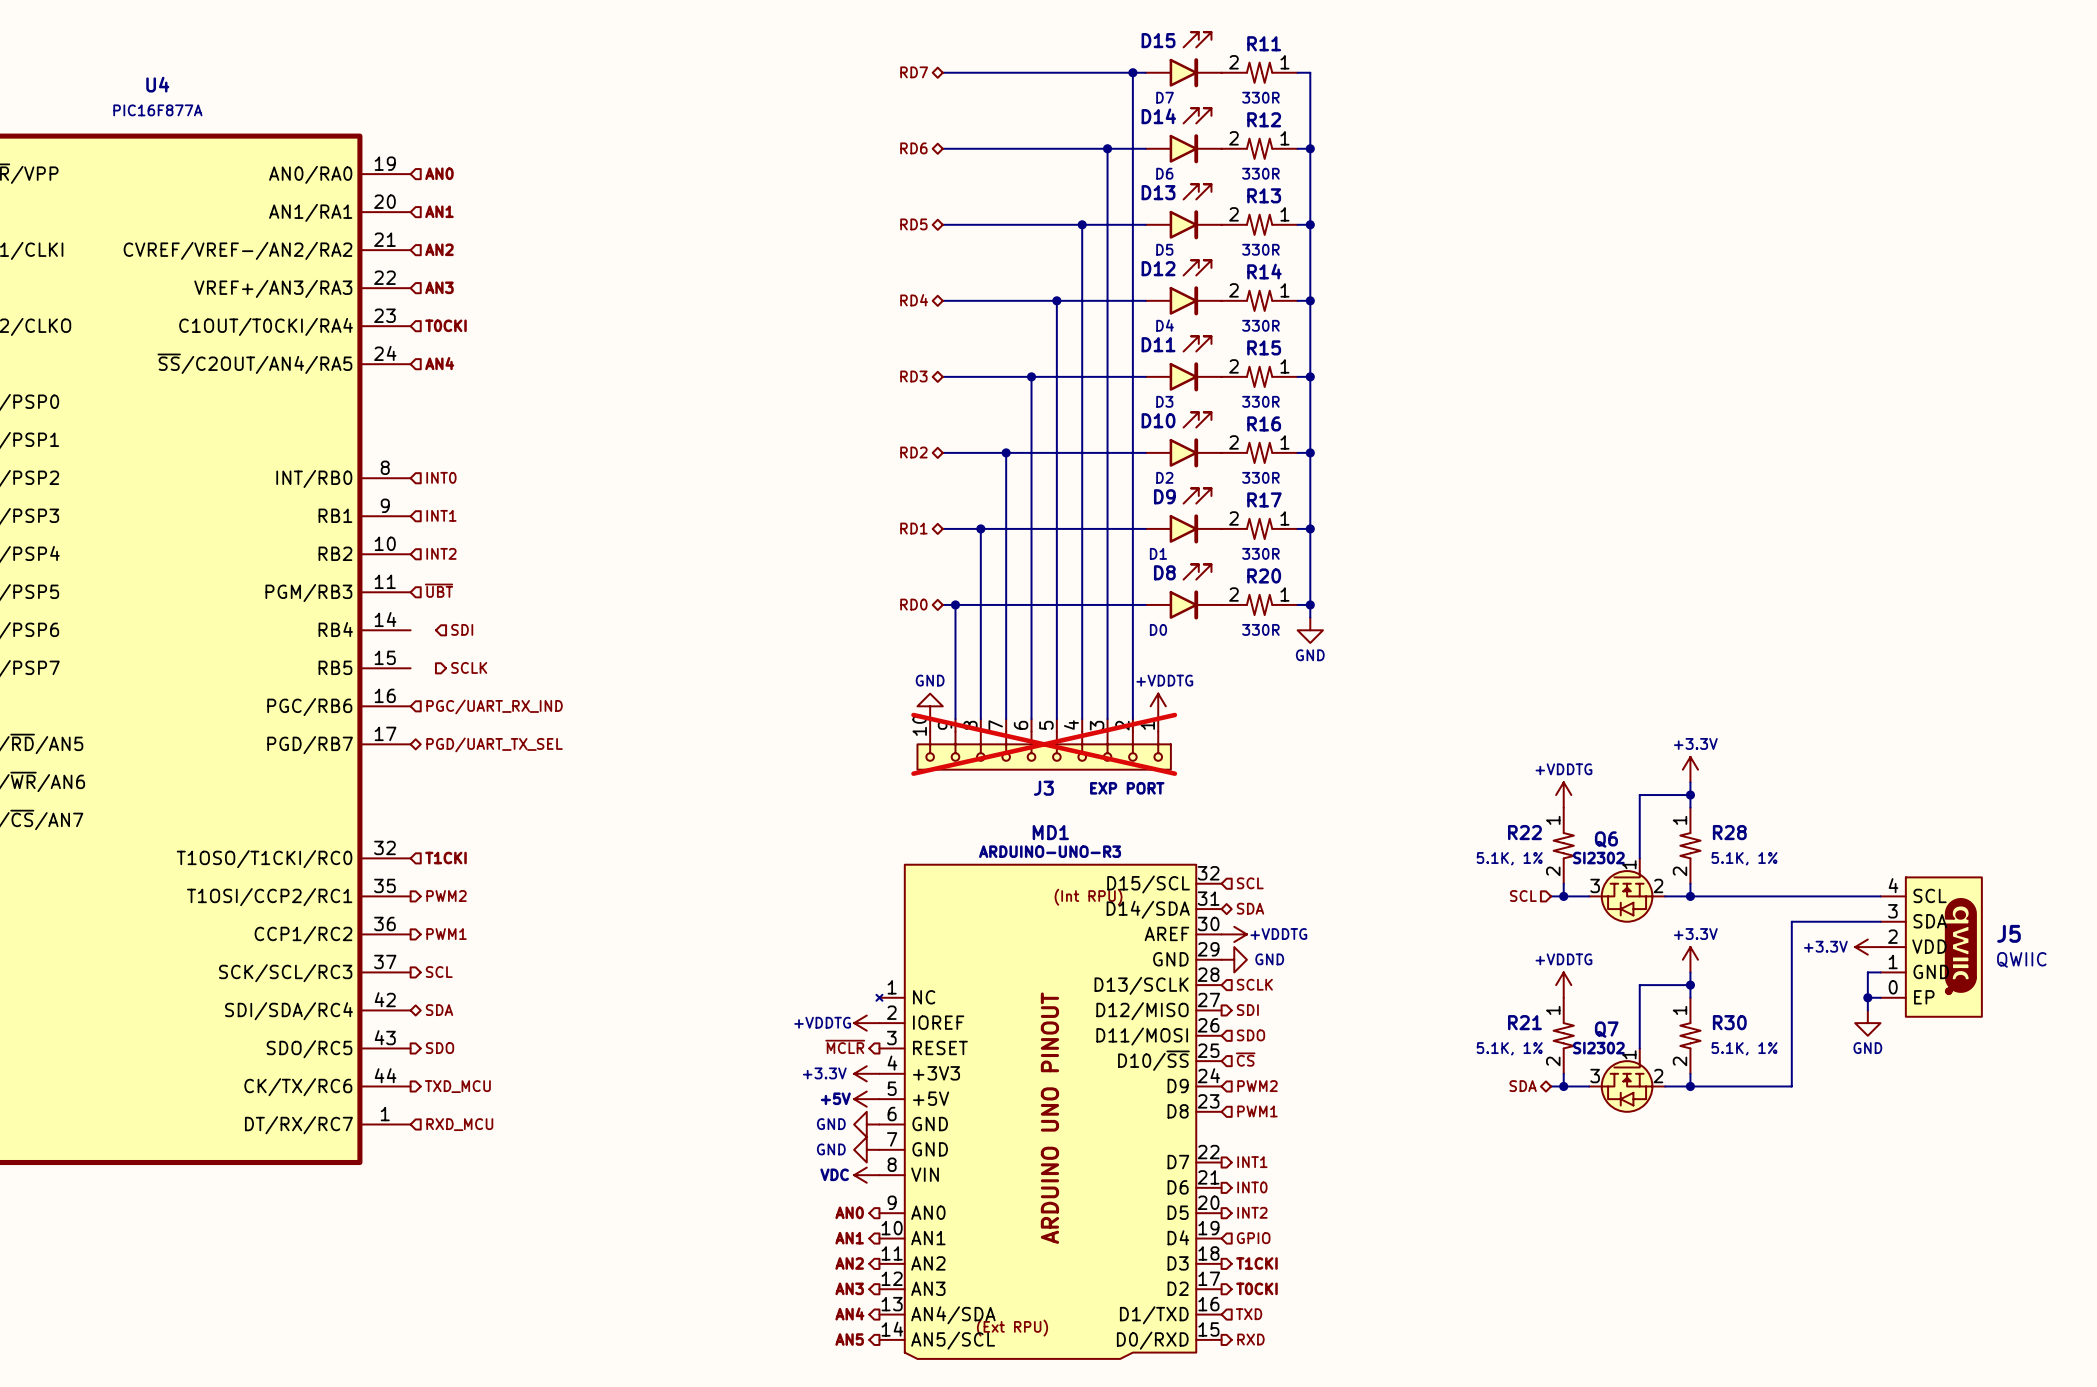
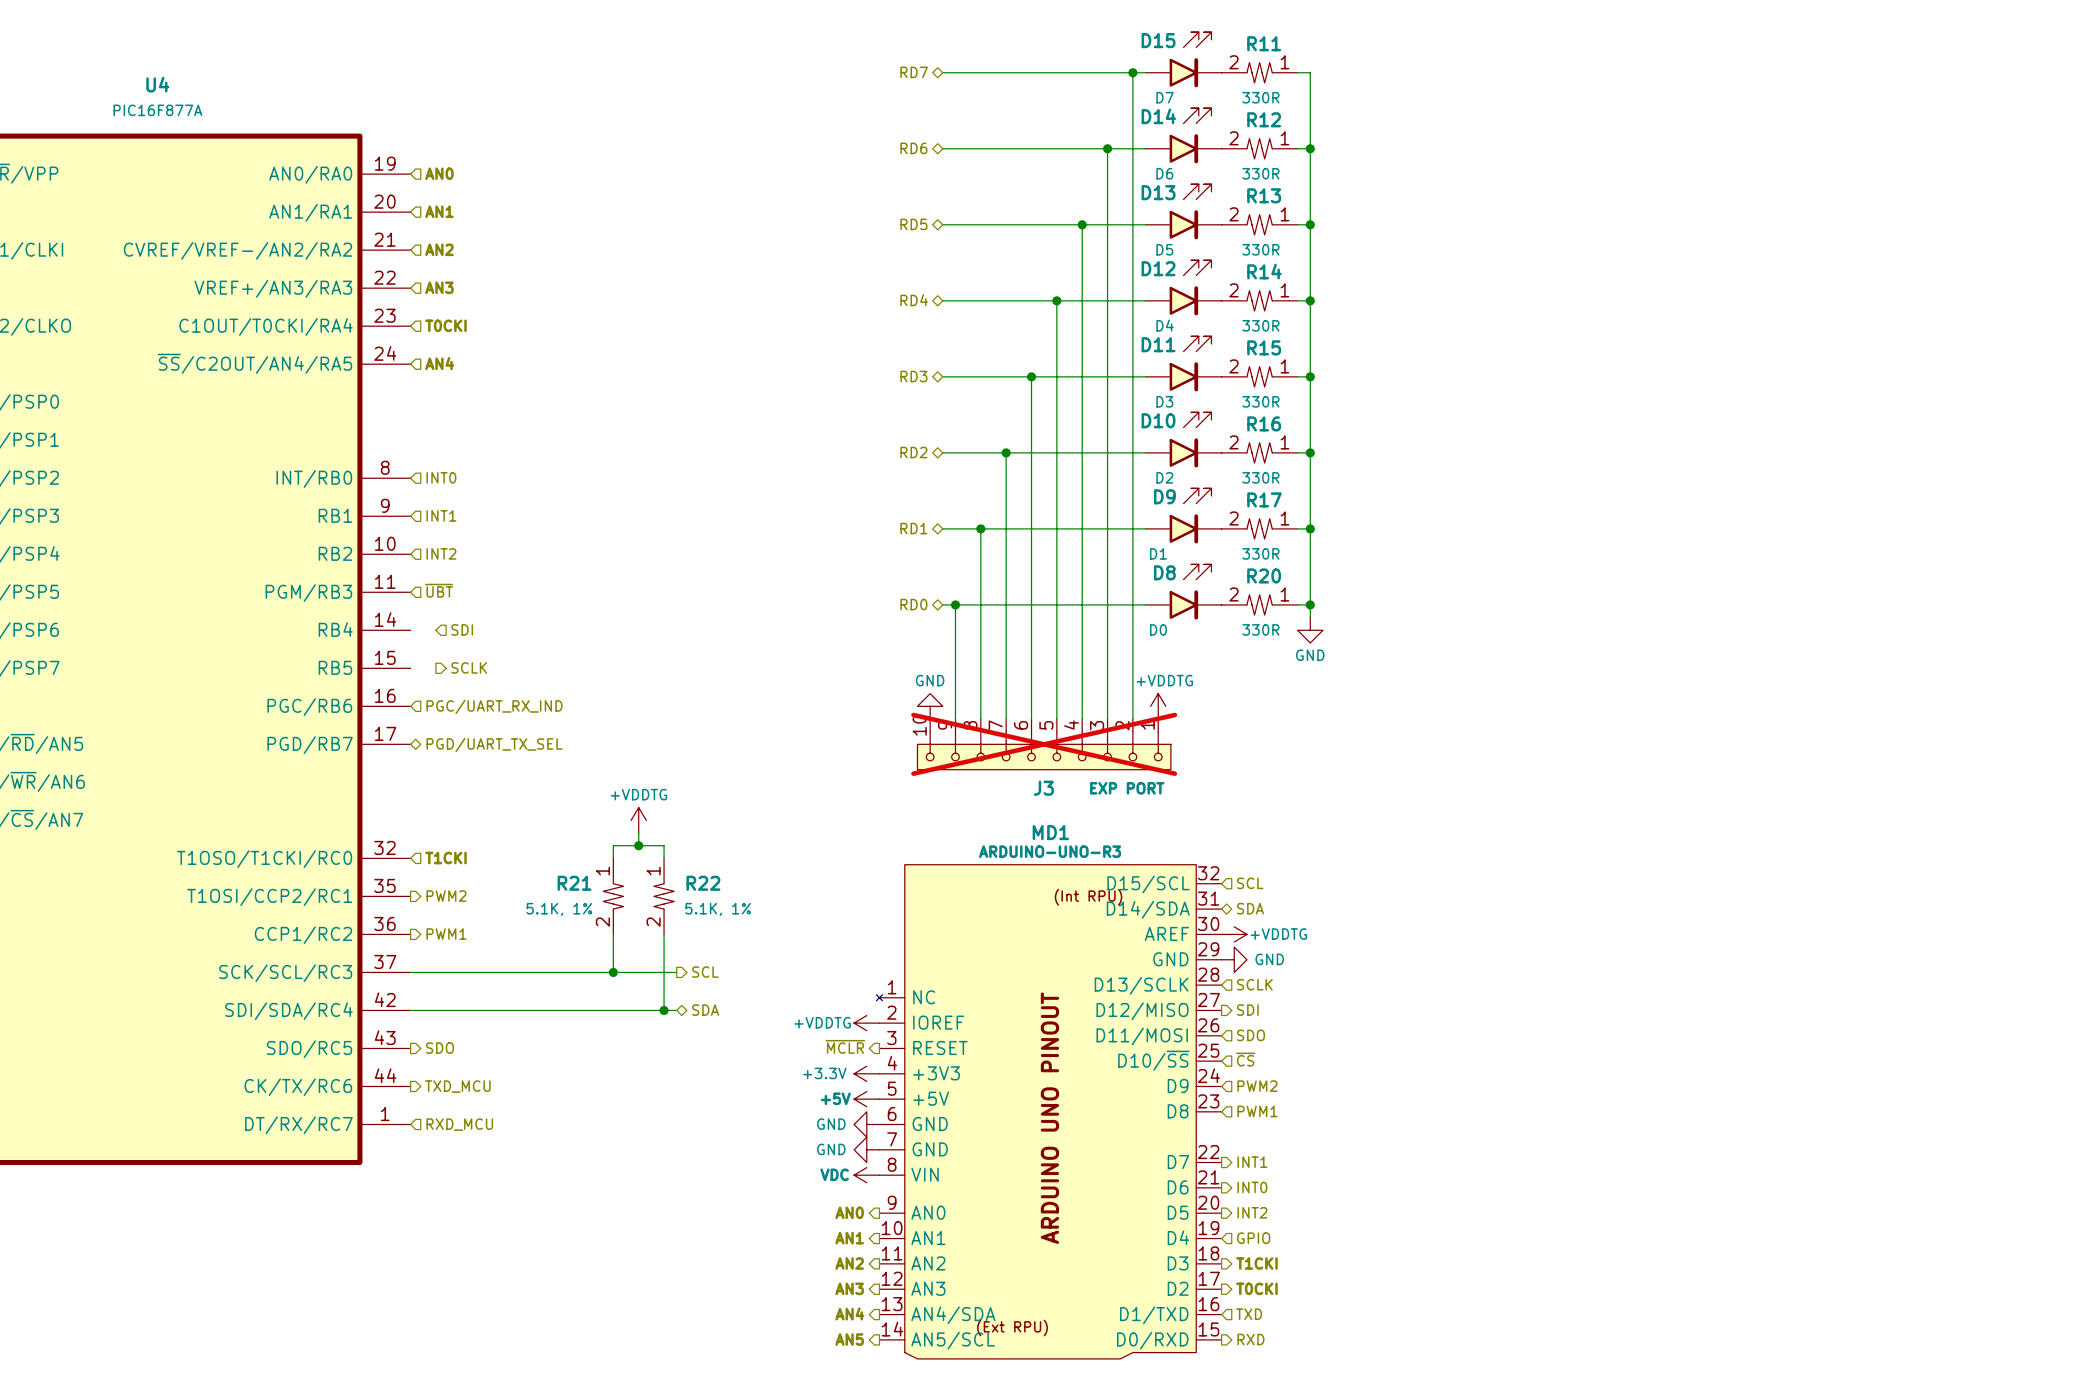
power symbol: +3.3V (1690, 769) -> none
wire: (1690, 782) (1690, 807) -> none
power symbol: +VDDTG (1563, 795) -> none
wire: (1690, 795) (1639, 795) (1639, 858) -> none
junction: (1690, 795) -> none
power symbol: none -> +VDDTG (638, 820)
wire: none -> (638, 833) (638, 845)
junction: none -> (638, 845)
R22 flip: as is (1563, 845) -> left-right (664, 896)
R22 position: (1563, 845) -> (664, 896)
R28: 5.1K, 1% (1690, 845) -> none
wire: none -> (613, 858) (613, 845) (664, 845) (664, 858)
wire: (1563, 883) (1563, 896) -> none
wire: (1690, 883) (1690, 896) -> none
Q6: SI2302 (1627, 890) -> none
hierarchical label: SCL (1523, 896) -> none
wire: (1551, 896) (1589, 896) -> none
junction: (1563, 896) -> none
wire: (1665, 896) (1880, 896) -> none
junction: (1690, 896) -> none
wire: (1880, 921) (1791, 921) (1791, 1086) (1665, 1086) -> none
wire: none -> (613, 934) (613, 972)
wire: none -> (664, 934) (664, 1010)
power symbol: +3.3V (1867, 947) -> none
J5: QWIIC (1931, 947) -> none
power symbol: +3.3V (1690, 959) -> none
wire: none -> (410, 972) (676, 972)
hierarchical label: SCL (439, 972) -> none
junction: none -> (613, 972)
hierarchical label: none -> SCL (705, 972)
wire: (1690, 972) (1690, 997) -> none
wire: (1880, 972) (1867, 972) (1867, 1010) -> none
power symbol: +VDDTG (1563, 985) -> none
wire: (1690, 985) (1639, 985) (1639, 1048) -> none
junction: (1690, 985) -> none
wire: (1867, 997) (1880, 997) -> none
junction: (1867, 997) -> none
wire: none -> (410, 1010) (676, 1010)
hierarchical label: SDA (439, 1010) -> none
junction: none -> (664, 1010)
hierarchical label: none -> SDA (705, 1010)
power symbol: GND (1867, 1023) -> none
R21 position: (1563, 1035) -> (613, 896)
R30: 5.1K, 1% (1690, 1035) -> none
wire: (1563, 1073) (1563, 1086) -> none
wire: (1690, 1073) (1690, 1086) -> none
Q7: SI2302 (1627, 1080) -> none
hierarchical label: SDA (1523, 1086) -> none
wire: (1551, 1086) (1589, 1086) -> none
junction: (1563, 1086) -> none
junction: (1690, 1086) -> none

